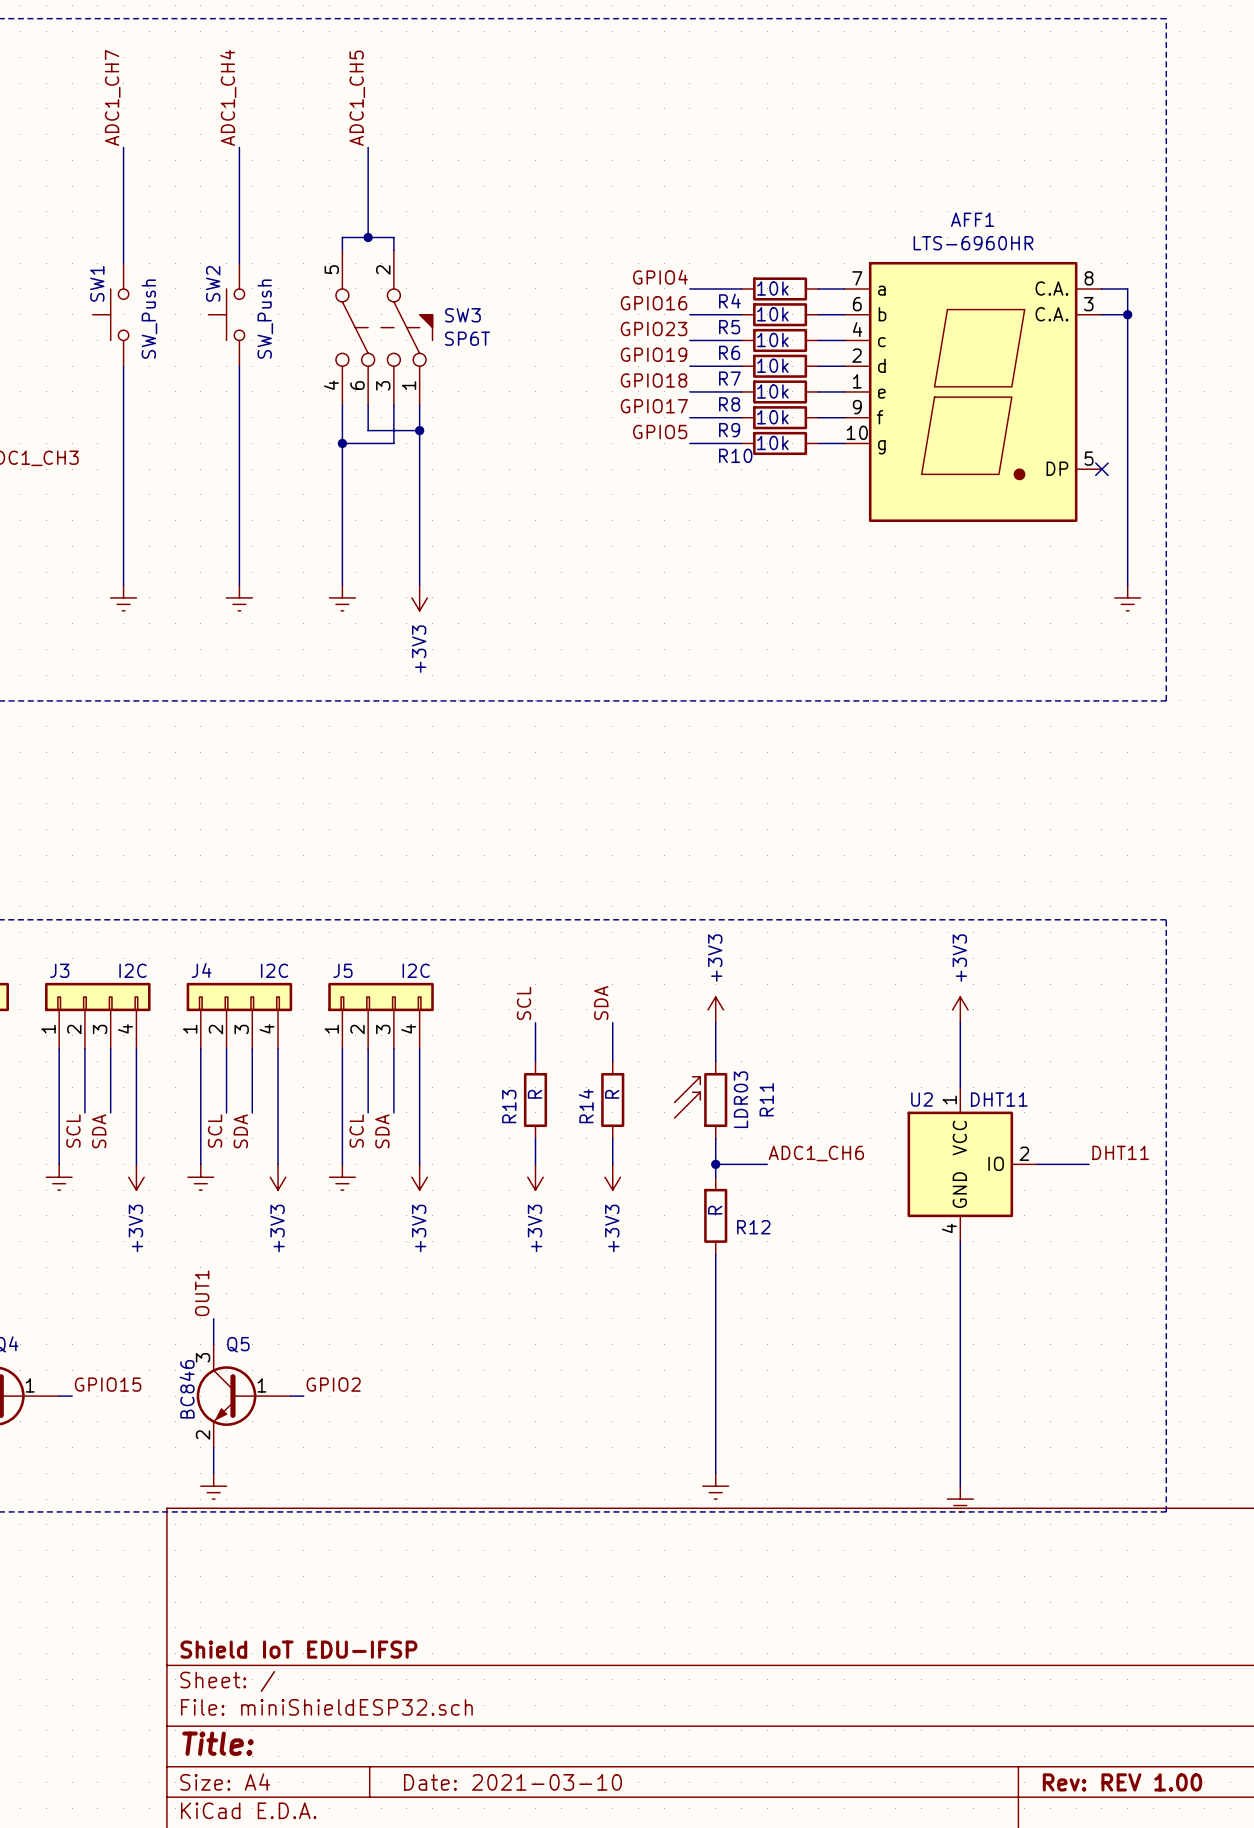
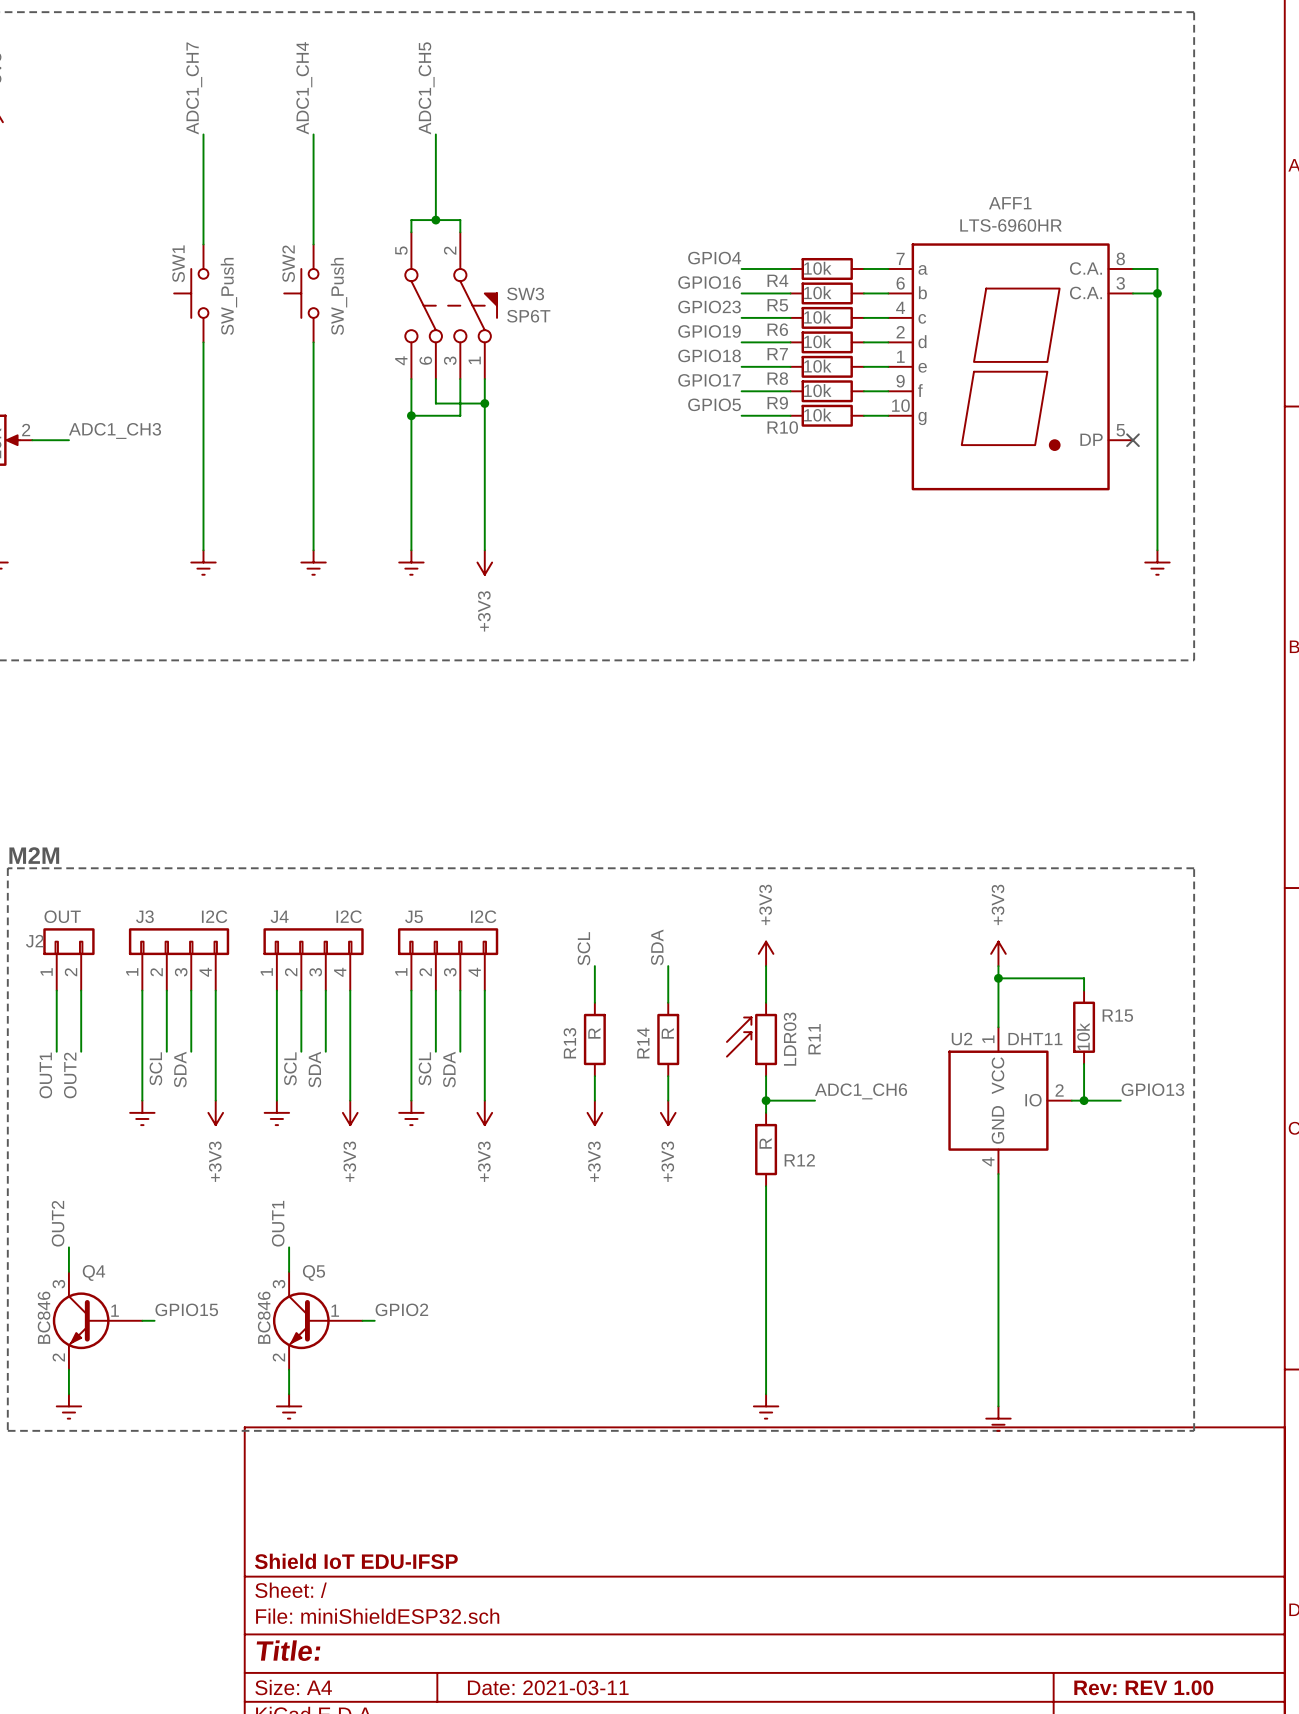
wire: none -> (998, 978) (1084, 978) (1084, 990)
junction: none -> (998, 978)
R15: none -> 10k (1084, 1027)
wire: none -> (1084, 1063) (1084, 1100)
label: DHT11 (1120, 1152) -> GPIO13 (1152, 1089)
junction: none -> (1084, 1100)
title block: Date: 2021-03-10 (512, 1782) -> Date: 2021-03-11 (548, 1687)

